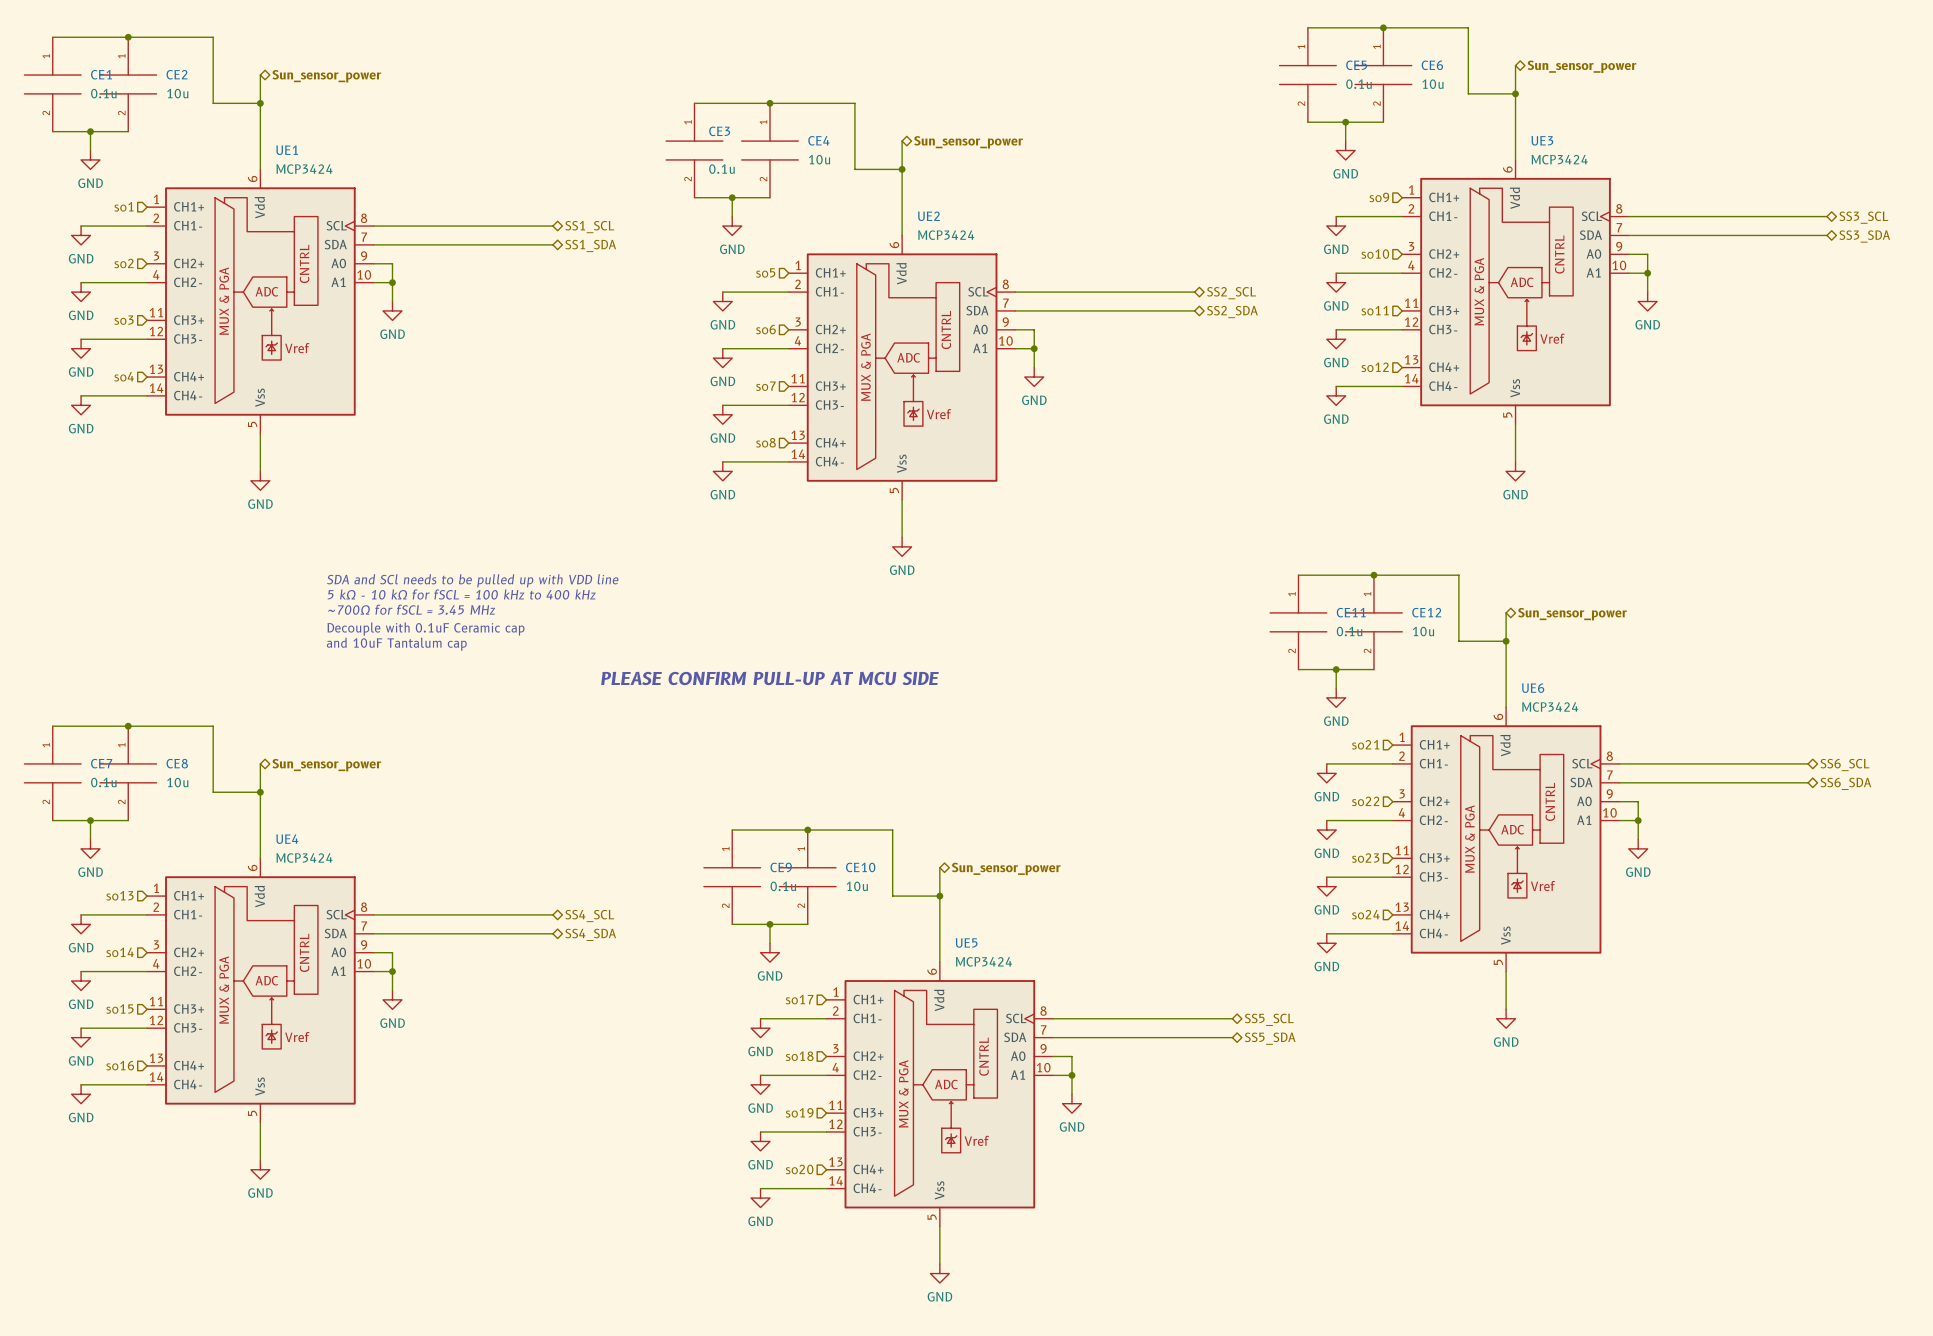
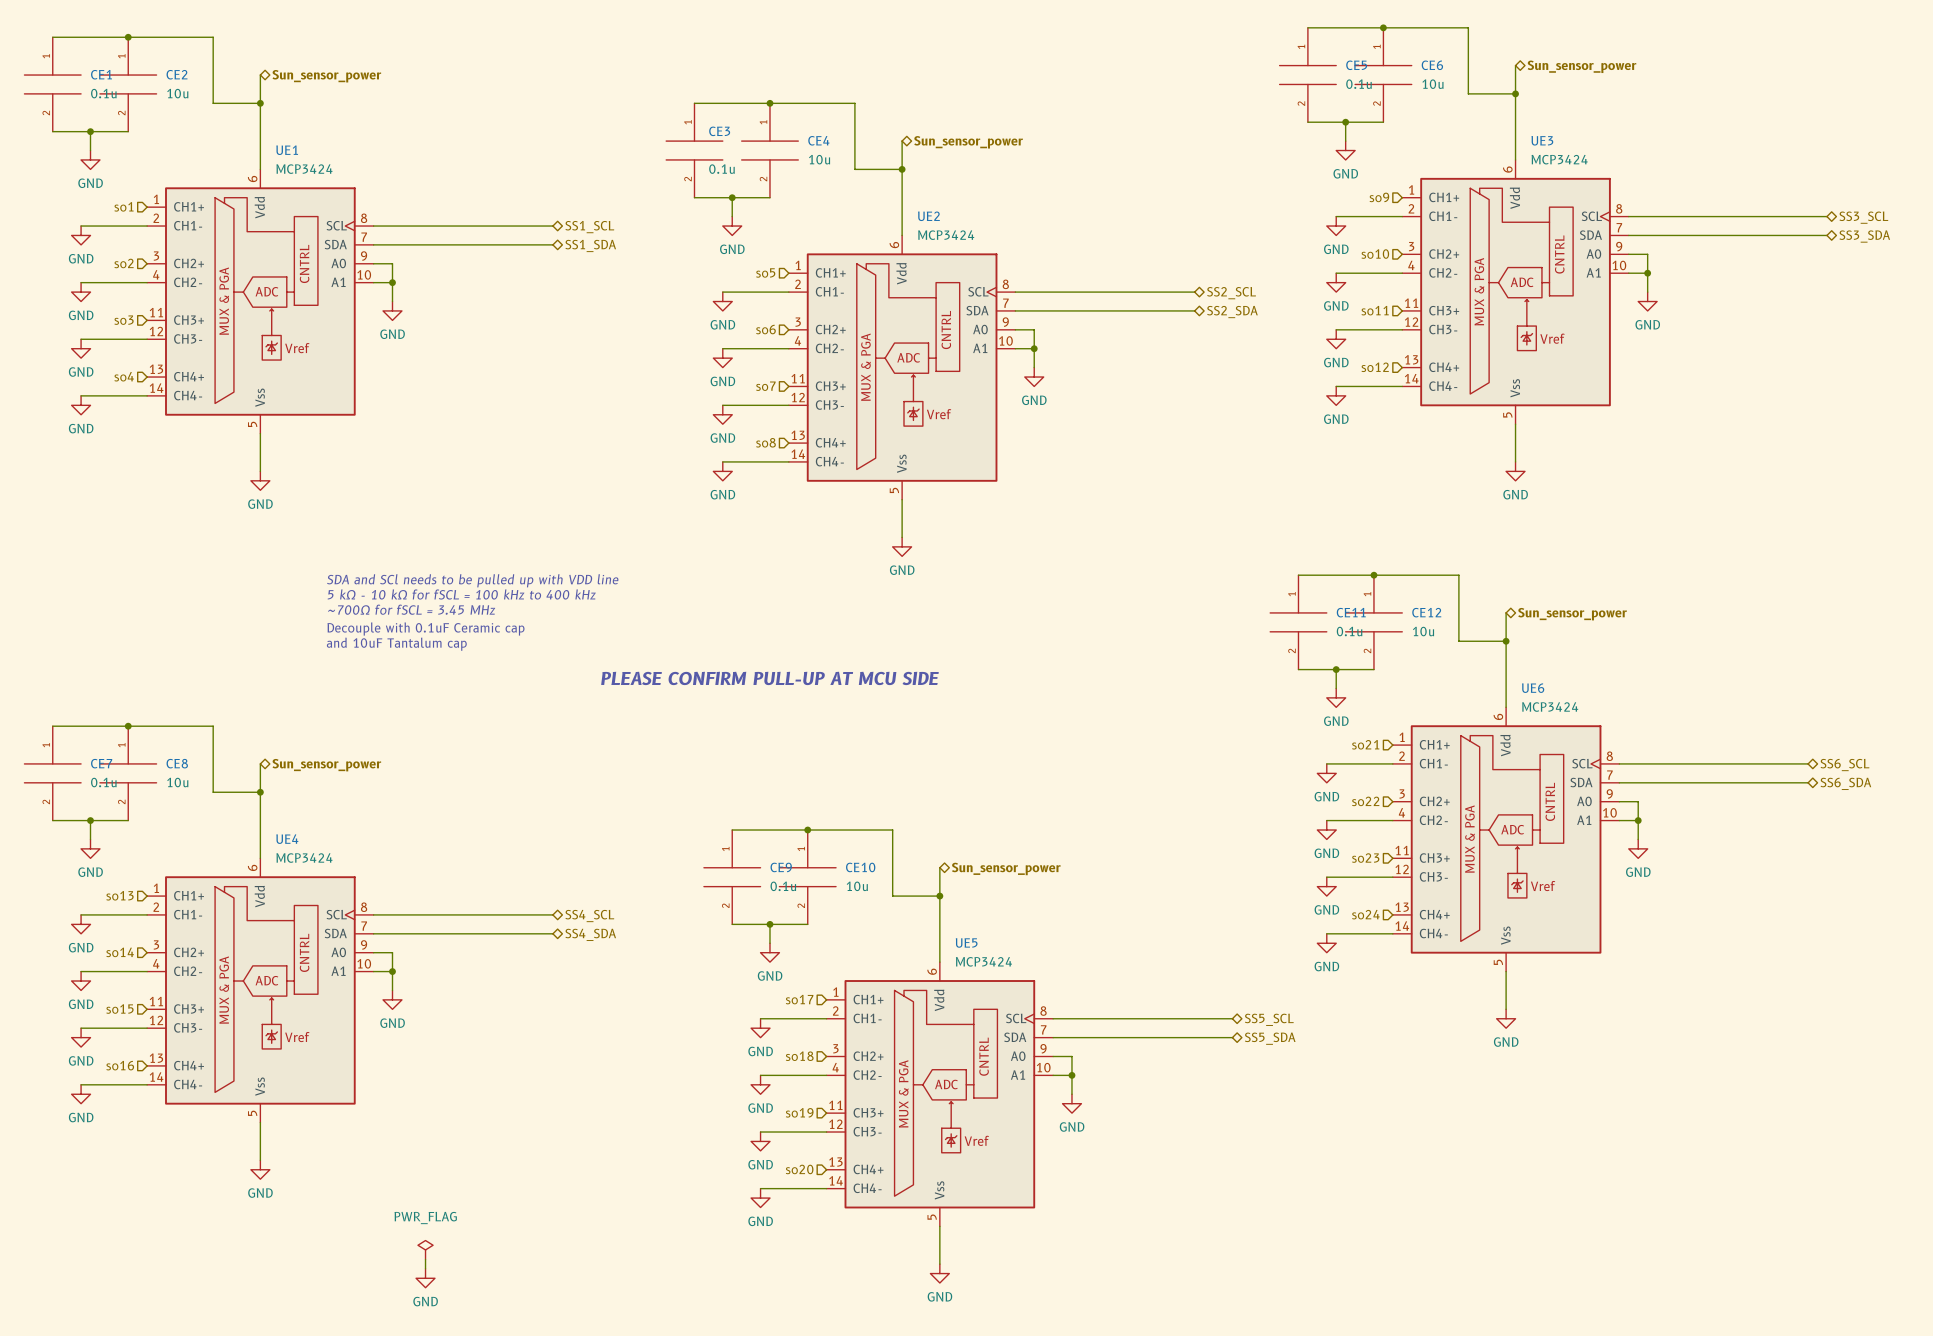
power symbol: none -> PWR_FLAG (425, 1249)
wire: none -> (425, 1259) (425, 1268)
power symbol: none -> GND (425, 1278)

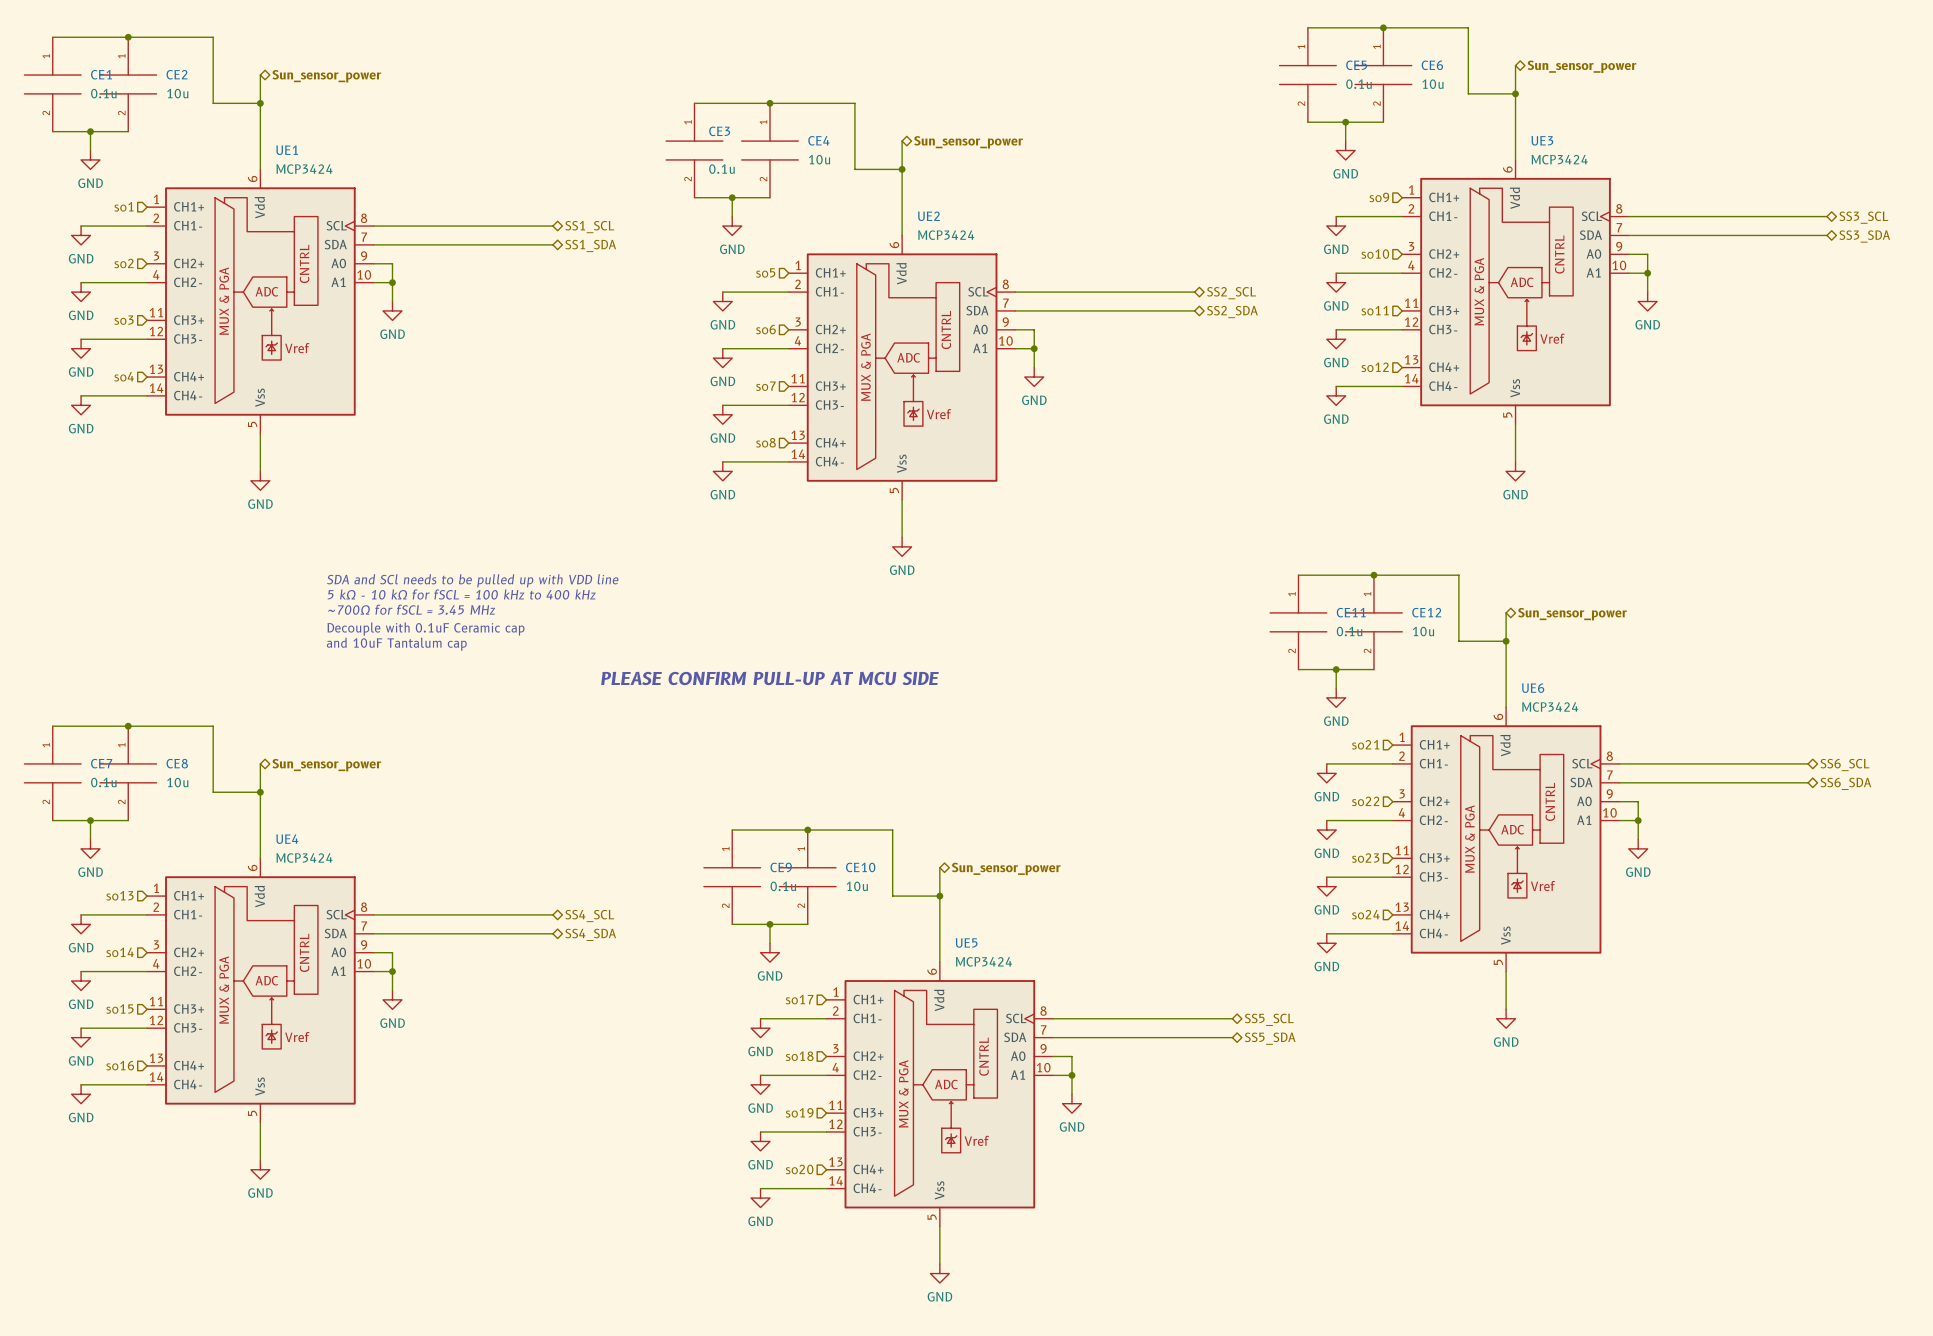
power symbol: PWR_FLAG (425, 1249) -> none
wire: (425, 1259) (425, 1268) -> none
power symbol: GND (425, 1278) -> none

